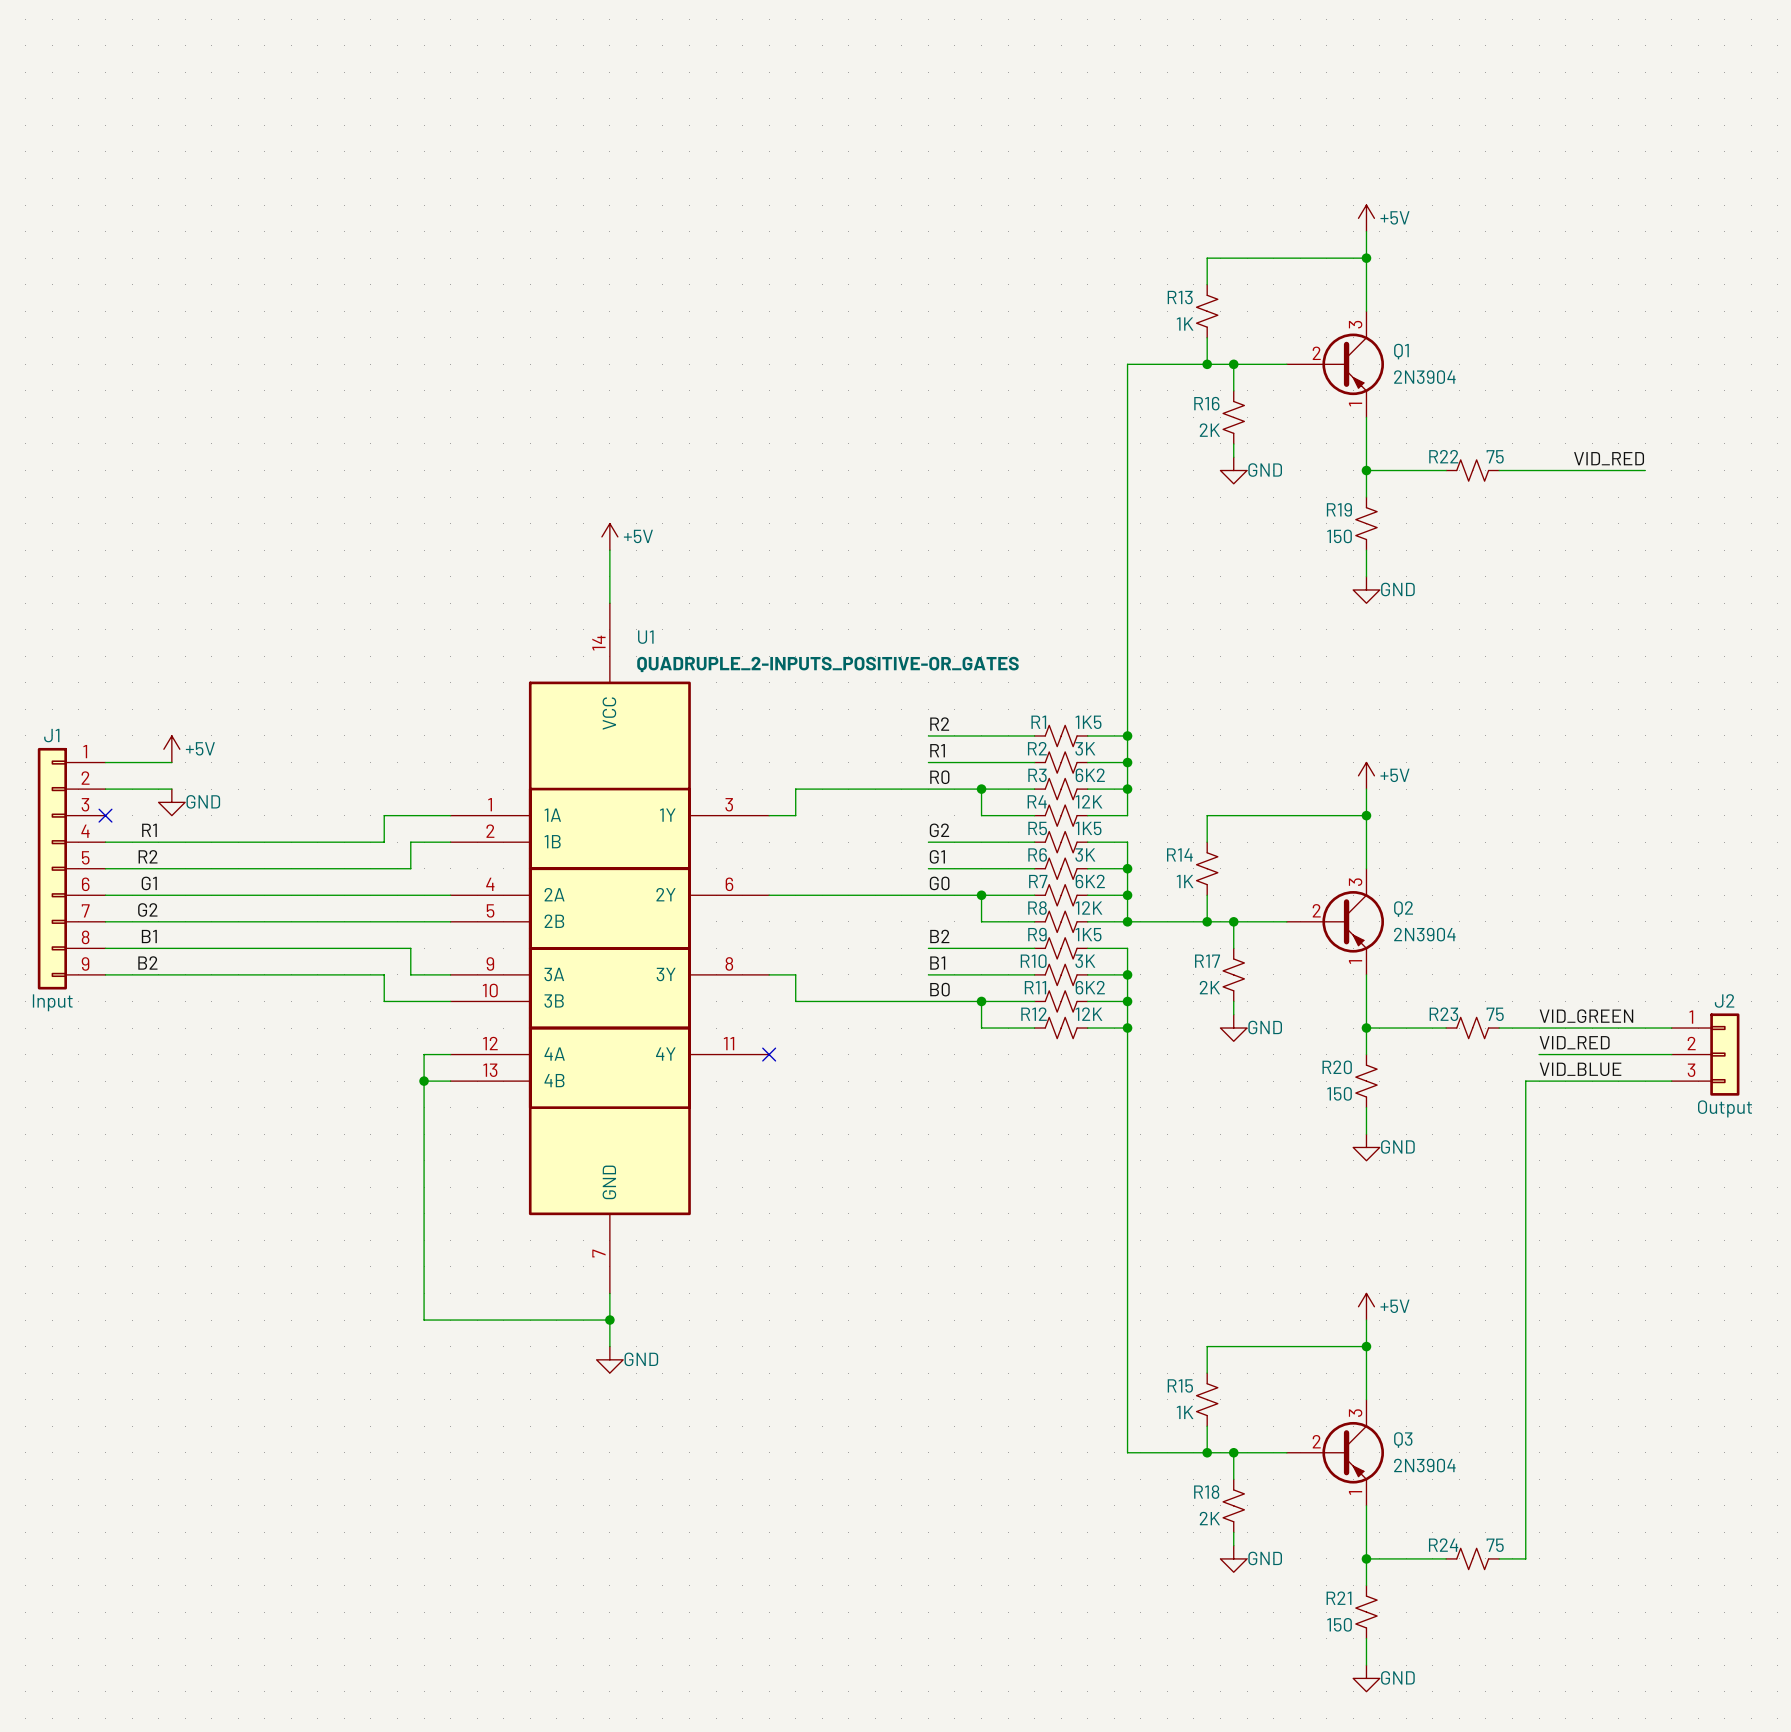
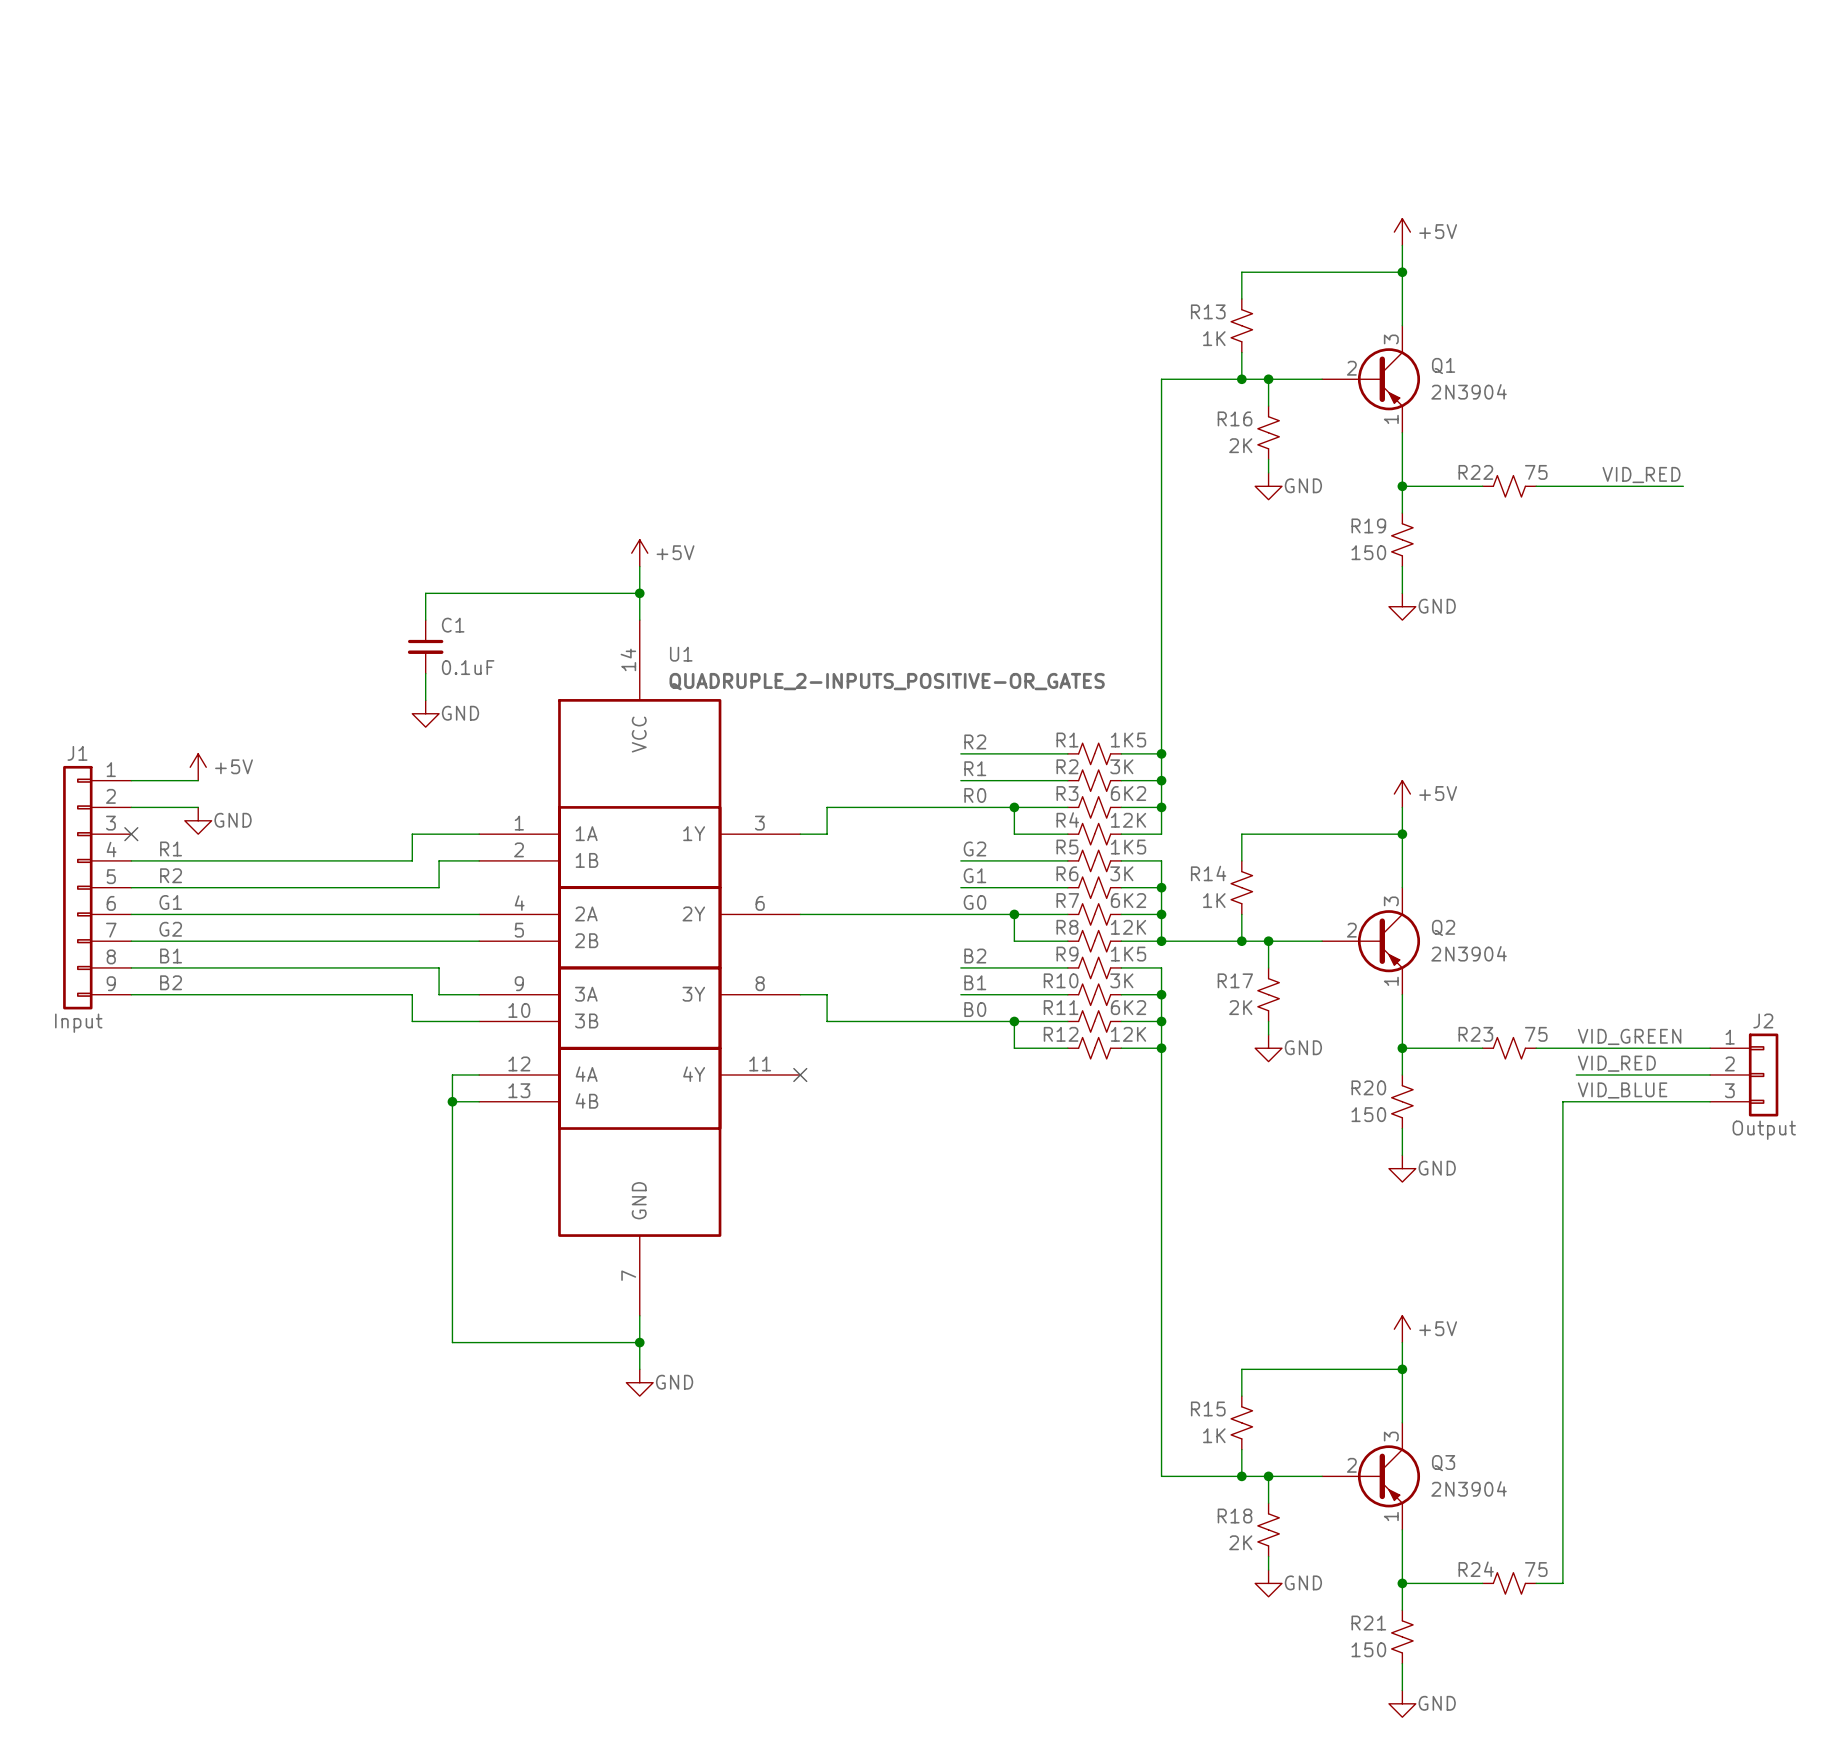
wire: none -> (639, 593) (425, 593) (425, 620)
junction: none -> (639, 593)
C1: none -> 0.1uF (425, 646)
wire: none -> (425, 673) (425, 700)
power symbol: none -> GND (425, 713)

